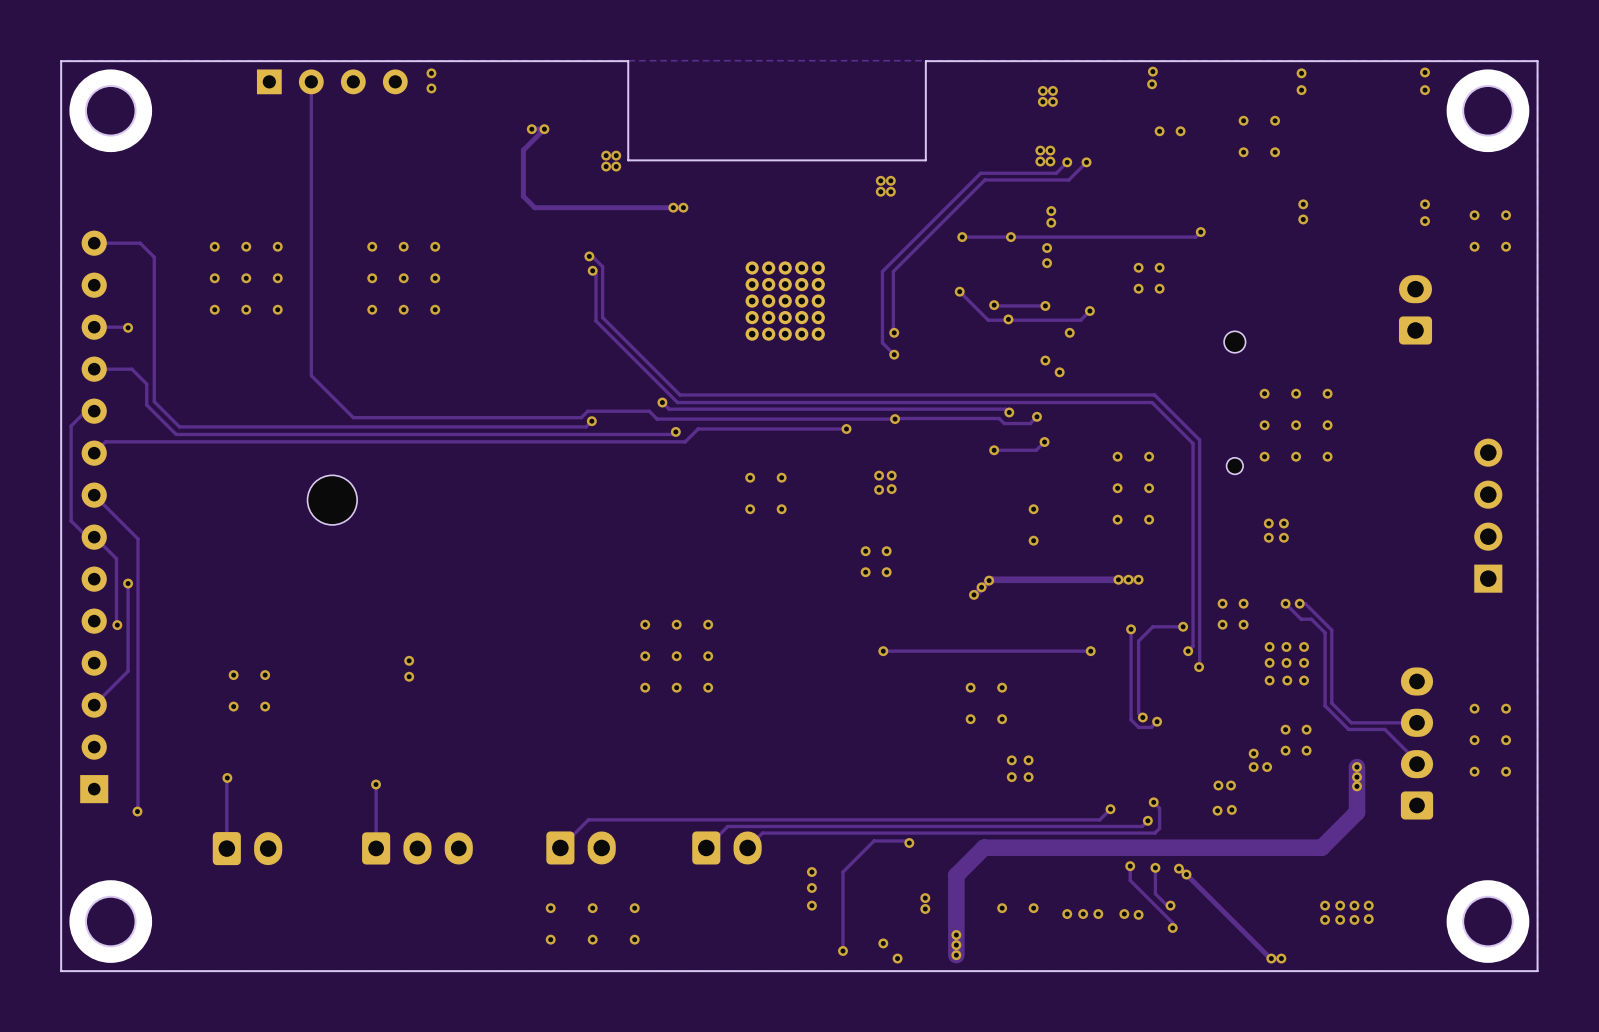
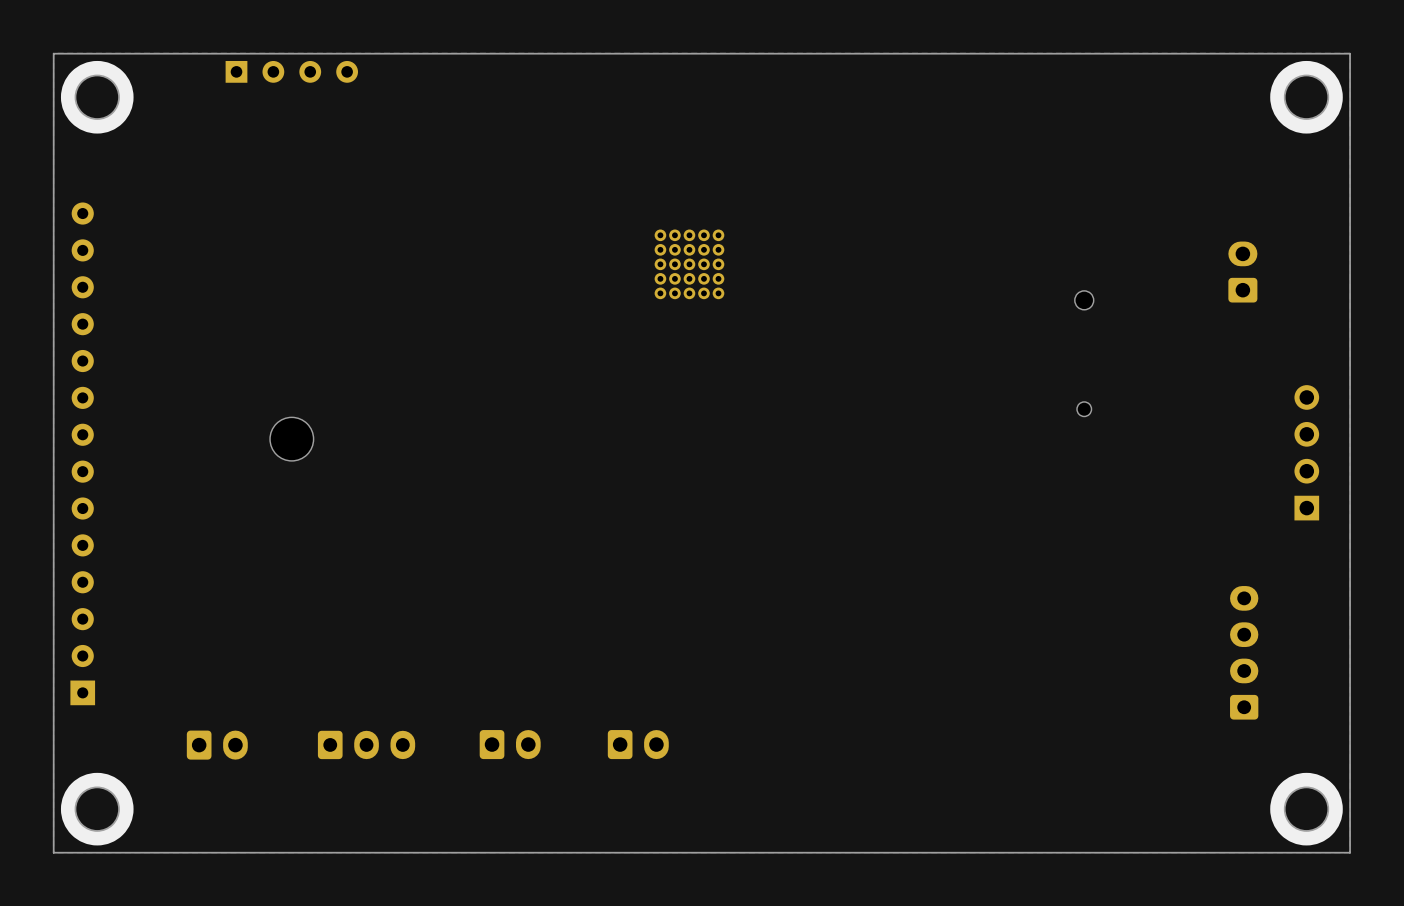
part footprint: [60, 60, 1539, 973] -> [52, 52, 1351, 854]
via: (1152, 71) -> none
via: (1425, 72) -> none
via: (431, 73) -> none
via: (1301, 73) -> none
track: (311, 81) (311, 375) (353, 417) (581, 417) (587, 411) (649, 411) (657, 419) (999, 418) (1004, 423) (1030, 423) (1036, 416) -> none
via: (1152, 84) -> none
via: (431, 88) -> none
via: (1042, 90) -> none
via: (1052, 90) -> none
via: (1301, 90) -> none
via: (1425, 90) -> none
via: (1042, 101) -> none
via: (1052, 101) -> none
via: (1243, 120) -> none
via: (1275, 120) -> none
track: (531, 129) (544, 129) (523, 150) (523, 196) (534, 207) (683, 207) -> none
via: (531, 129) -> none
via: (544, 129) -> none
via: (1159, 131) -> none
via: (1180, 131) -> none
via: (1040, 150) -> none
via: (1050, 150) -> none
via: (1243, 152) -> none
via: (1275, 152) -> none
via: (606, 155) -> none
via: (616, 155) -> none
via: (1040, 161) -> none
via: (1050, 161) -> none
track: (1067, 162) (1056, 173) (980, 173) (882, 271) (882, 342) (894, 354) -> none
via: (1067, 162) -> none
track: (1086, 162) (1068, 179) (984, 179) (893, 271) (894, 332) -> none
via: (1086, 162) -> none
via: (606, 166) -> none
via: (616, 166) -> none
via: (880, 180) -> none
via: (890, 180) -> none
via: (880, 191) -> none
via: (890, 191) -> none
via: (1303, 204) -> none
via: (1425, 204) -> none
via: (673, 207) -> none
via: (683, 207) -> none
via: (1051, 211) -> none
via: (1474, 215) -> none
via: (1506, 215) -> none
via: (1303, 219) -> none
via: (1425, 221) -> none
via: (1051, 222) -> none
track: (1200, 232) (1195, 237) (962, 237) -> none
via: (1200, 232) -> none
via: (962, 237) -> none
via: (1010, 237) -> none
track: (94, 243) (140, 243) (154, 257) (154, 401) (179, 426) (586, 426) (591, 421) -> none
via: (214, 246) -> none
via: (246, 246) -> none
via: (277, 246) -> none
via: (372, 246) -> none
via: (403, 246) -> none
via: (435, 246) -> none
via: (1474, 246) -> none
via: (1506, 246) -> none
via: (1047, 248) -> none
track: (589, 256) (592, 256) (602, 266) (602, 317) (680, 394) (1154, 394) (1199, 440) (1199, 667) -> none
via: (589, 256) -> none
via: (1047, 263) -> none
via: (1138, 267) -> none
via: (1159, 267) -> none
track: (592, 270) (596, 274) (596, 321) (677, 402) (1152, 402) (1193, 443) (1193, 646) (1188, 651) -> none
via: (592, 270) -> none
via: (214, 278) -> none
via: (246, 278) -> none
via: (277, 278) -> none
via: (372, 278) -> none
via: (403, 278) -> none
via: (435, 278) -> none
via: (1138, 288) -> none
via: (1159, 288) -> none
track: (959, 291) (988, 320) (1080, 320) (1089, 311) -> none
via: (959, 291) -> none
track: (994, 305) (1045, 305) -> none
via: (994, 305) -> none
via: (1045, 305) -> none
via: (214, 309) -> none
via: (246, 309) -> none
via: (277, 309) -> none
via: (372, 309) -> none
via: (403, 309) -> none
via: (435, 309) -> none
via: (1089, 311) -> none
via: (1008, 319) -> none
track: (94, 327) (128, 327) -> none
via: (128, 327) -> none
via: (894, 332) -> none
via: (1069, 332) -> none
via: (894, 354) -> none
via: (1045, 360) -> none
track: (94, 369) (131, 369) (146, 384) (146, 405) (176, 434) (673, 434) (675, 431) -> none
via: (1059, 372) -> none
via: (1264, 393) -> none
via: (1296, 393) -> none
via: (1327, 393) -> none
track: (662, 402) (669, 409) (1005, 409) (1009, 412) -> none
via: (662, 402) -> none
track: (94, 411) (85, 411) (71, 425) (71, 520) (87, 537) (94, 537) (116, 558) (117, 625) -> none
via: (1009, 412) -> none
via: (1036, 416) -> none
via: (895, 419) -> none
via: (591, 421) -> none
via: (1264, 425) -> none
via: (1296, 425) -> none
via: (1327, 425) -> none
track: (846, 428) (698, 428) (685, 441) (105, 441) (94, 453) -> none
via: (846, 428) -> none
via: (675, 431) -> none
track: (1044, 442) (1036, 450) (994, 450) -> none
via: (1044, 442) -> none
via: (994, 450) -> none
via: (1117, 456) -> none
via: (1149, 456) -> none
via: (1264, 456) -> none
via: (1296, 456) -> none
via: (1327, 456) -> none
via: (879, 475) -> none
via: (891, 475) -> none
via: (750, 477) -> none
via: (781, 477) -> none
via: (1117, 488) -> none
via: (1149, 488) -> none
via: (879, 489) -> none
via: (891, 489) -> none
track: (94, 495) (137, 538) (137, 811) -> none
via: (750, 509) -> none
via: (781, 509) -> none
via: (1033, 509) -> none
via: (1117, 519) -> none
via: (1149, 519) -> none
via: (1268, 523) -> none
via: (1283, 523) -> none
via: (1268, 537) -> none
via: (1283, 537) -> none
via: (1033, 540) -> none
via: (865, 551) -> none
via: (886, 551) -> none
via: (865, 572) -> none
via: (886, 572) -> none
via: (1118, 579) -> none
via: (1128, 579) -> none
track: (1138, 579) (992, 579) (989, 580) (974, 594) -> none
via: (1138, 579) -> none
via: (989, 580) -> none
track: (128, 583) (128, 671) (94, 705) -> none
via: (128, 583) -> none
via: (981, 587) -> none
via: (974, 594) -> none
via: (1222, 603) -> none
via: (1243, 603) -> none
track: (1285, 603) (1301, 619) (1311, 619) (1325, 632) (1325, 705) (1348, 729) (1384, 729) (1416, 761) (1416, 764) -> none
via: (1285, 603) -> none
track: (1299, 603) (1305, 603) (1331, 630) (1331, 703) (1351, 722) (1416, 722) -> none
via: (1299, 603) -> none
via: (645, 624) -> none
via: (676, 624) -> none
via: (708, 624) -> none
via: (1222, 624) -> none
via: (1243, 624) -> none
via: (117, 625) -> none
track: (1183, 626) (1152, 626) (1138, 641) (1138, 713) (1142, 717) -> none
via: (1183, 626) -> none
track: (1131, 629) (1131, 719) (1138, 727) (1151, 727) (1157, 721) -> none
via: (1131, 629) -> none
via: (1269, 646) -> none
via: (1286, 646) -> none
via: (1304, 646) -> none
via: (883, 651) -> none
track: (1090, 651) (883, 651) -> none
via: (1090, 651) -> none
via: (1188, 651) -> none
via: (645, 656) -> none
via: (676, 656) -> none
via: (708, 656) -> none
via: (409, 660) -> none
via: (1269, 662) -> none
via: (1286, 662) -> none
via: (1304, 662) -> none
via: (1199, 667) -> none
via: (233, 675) -> none
via: (265, 675) -> none
via: (409, 676) -> none
via: (1269, 680) -> none
via: (1287, 680) -> none
via: (1304, 680) -> none
via: (645, 687) -> none
via: (676, 687) -> none
via: (708, 687) -> none
via: (970, 687) -> none
via: (1002, 687) -> none
via: (233, 706) -> none
via: (265, 706) -> none
via: (1474, 708) -> none
via: (1506, 708) -> none
via: (1142, 717) -> none
via: (970, 719) -> none
via: (1002, 719) -> none
via: (1157, 721) -> none
via: (1285, 729) -> none
via: (1306, 729) -> none
via: (1474, 740) -> none
via: (1506, 740) -> none
via: (1285, 750) -> none
via: (1306, 750) -> none
via: (1253, 753) -> none
via: (1011, 760) -> none
via: (1028, 760) -> none
via: (1253, 767) -> none
via: (1267, 767) -> none
track: (1356, 767) (1356, 812) (1321, 847) (984, 847) (956, 875) (956, 955) -> none
via: (1356, 767) -> none
via: (1474, 771) -> none
via: (1506, 771) -> none
track: (227, 777) (226, 848) -> none
via: (227, 777) -> none
via: (1011, 777) -> none
via: (1028, 777) -> none
via: (1356, 777) -> none
track: (376, 784) (376, 848) -> none
via: (376, 784) -> none
via: (1218, 785) -> none
via: (1231, 785) -> none
via: (1356, 786) -> none
track: (1153, 802) (1159, 808) (1159, 828) (1154, 833) (762, 833) (747, 847) -> none
via: (1153, 802) -> none
track: (1110, 809) (1099, 819) (588, 819) (560, 847) -> none
via: (1110, 809) -> none
via: (1231, 809) -> none
via: (1217, 810) -> none
via: (137, 811) -> none
track: (1147, 820) (1142, 826) (727, 826) (706, 847) -> none
via: (1147, 820) -> none
track: (909, 843) (907, 840) (874, 840) (842, 872) (842, 950) -> none
via: (909, 843) -> none
track: (1130, 866) (1130, 880) (1172, 922) (1172, 927) -> none
via: (1130, 866) -> none
track: (1155, 867) (1155, 893) (1167, 905) (1170, 905) -> none
via: (1155, 867) -> none
track: (1178, 868) (1270, 958) (1281, 958) -> none
via: (1178, 868) -> none
via: (811, 872) -> none
via: (1186, 874) -> none
via: (811, 887) -> none
via: (925, 898) -> none
via: (811, 905) -> none
via: (1170, 905) -> none
via: (1325, 905) -> none
via: (1340, 905) -> none
via: (1354, 905) -> none
via: (1368, 905) -> none
via: (550, 908) -> none
via: (592, 908) -> none
via: (634, 908) -> none
via: (925, 908) -> none
via: (1002, 908) -> none
via: (1033, 908) -> none
via: (1067, 914) -> none
via: (1083, 914) -> none
via: (1098, 914) -> none
via: (1124, 914) -> none
via: (1138, 914) -> none
via: (1325, 919) -> none
via: (1340, 919) -> none
via: (1354, 919) -> none
via: (1368, 919) -> none
via: (1172, 927) -> none
via: (956, 935) -> none
via: (550, 939) -> none
via: (592, 939) -> none
via: (634, 939) -> none
via: (883, 943) -> none
via: (956, 945) -> none
via: (842, 950) -> none
via: (956, 955) -> none
via: (897, 958) -> none
via: (1271, 958) -> none
via: (1281, 958) -> none

